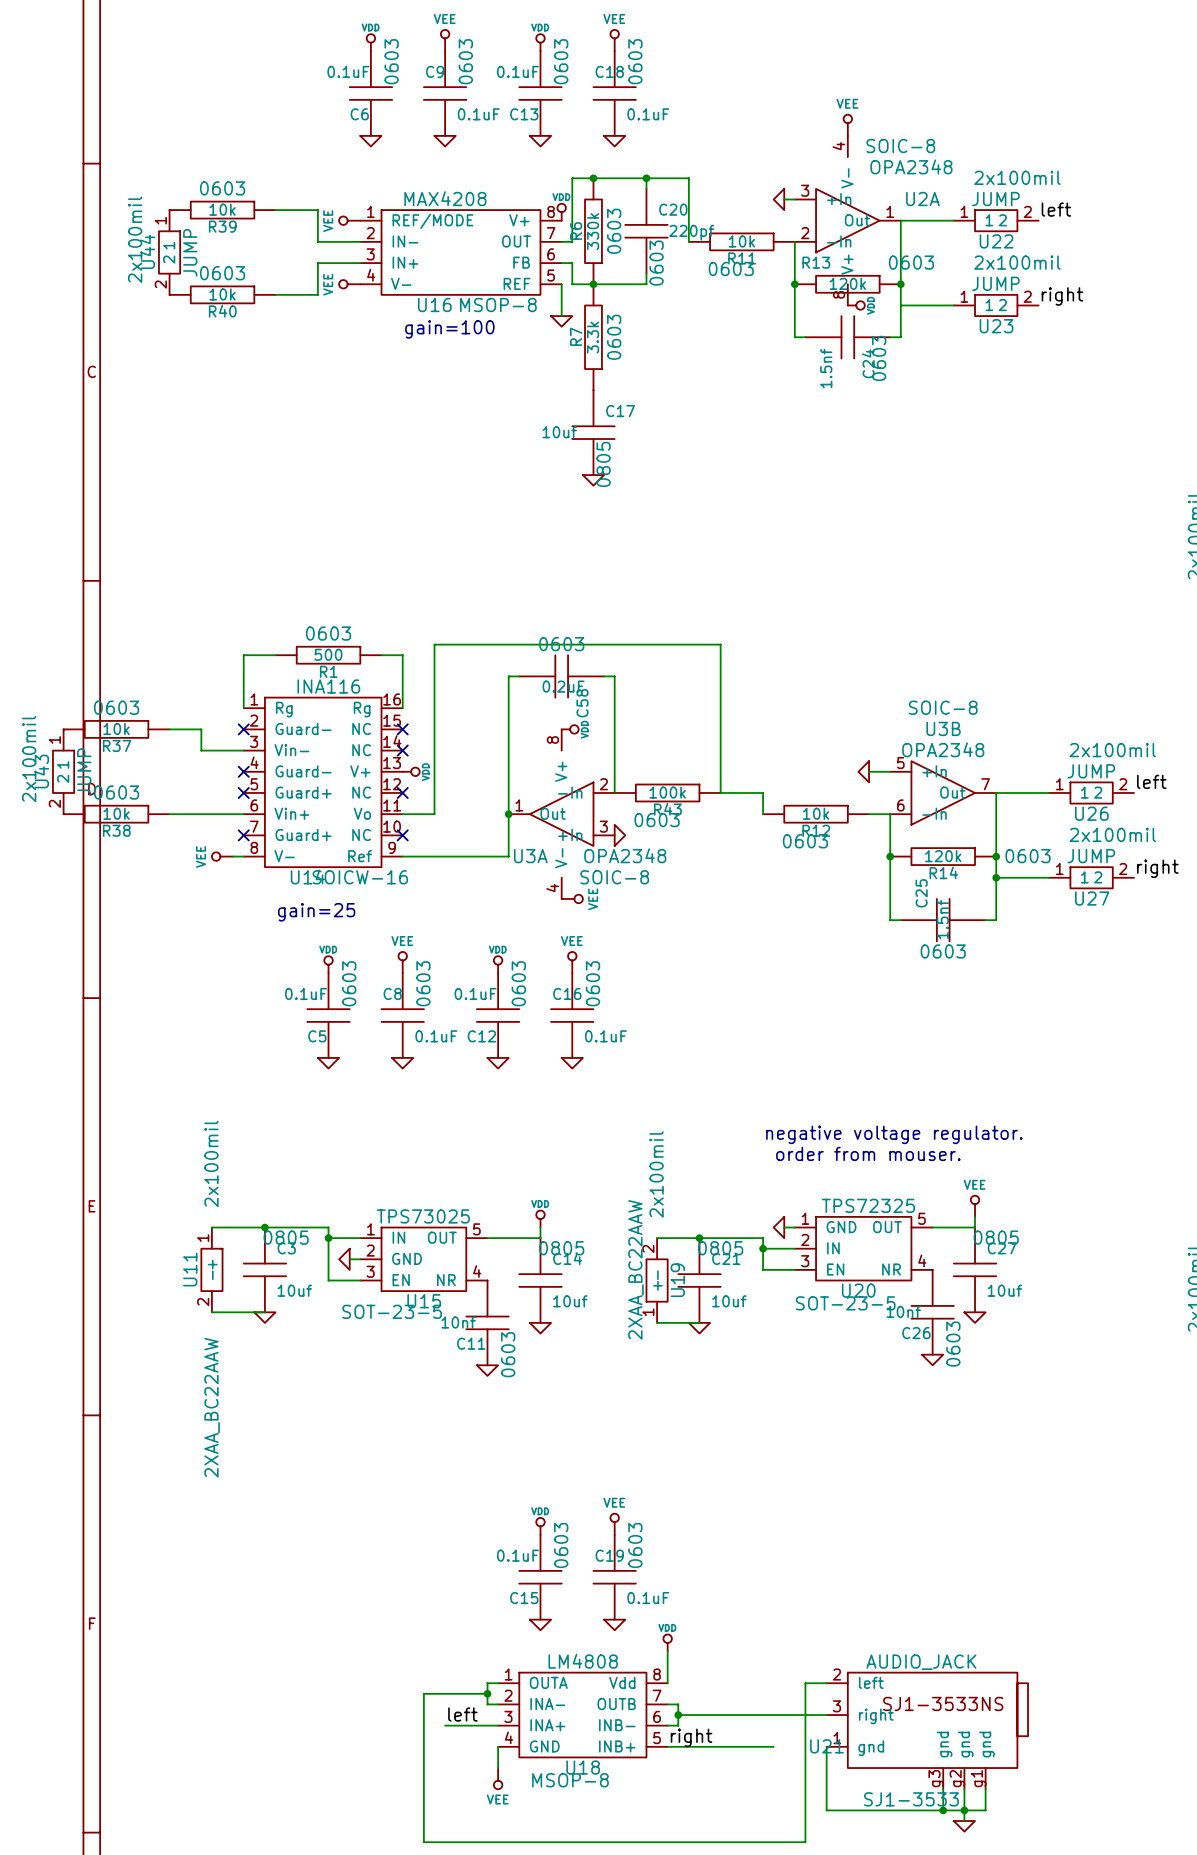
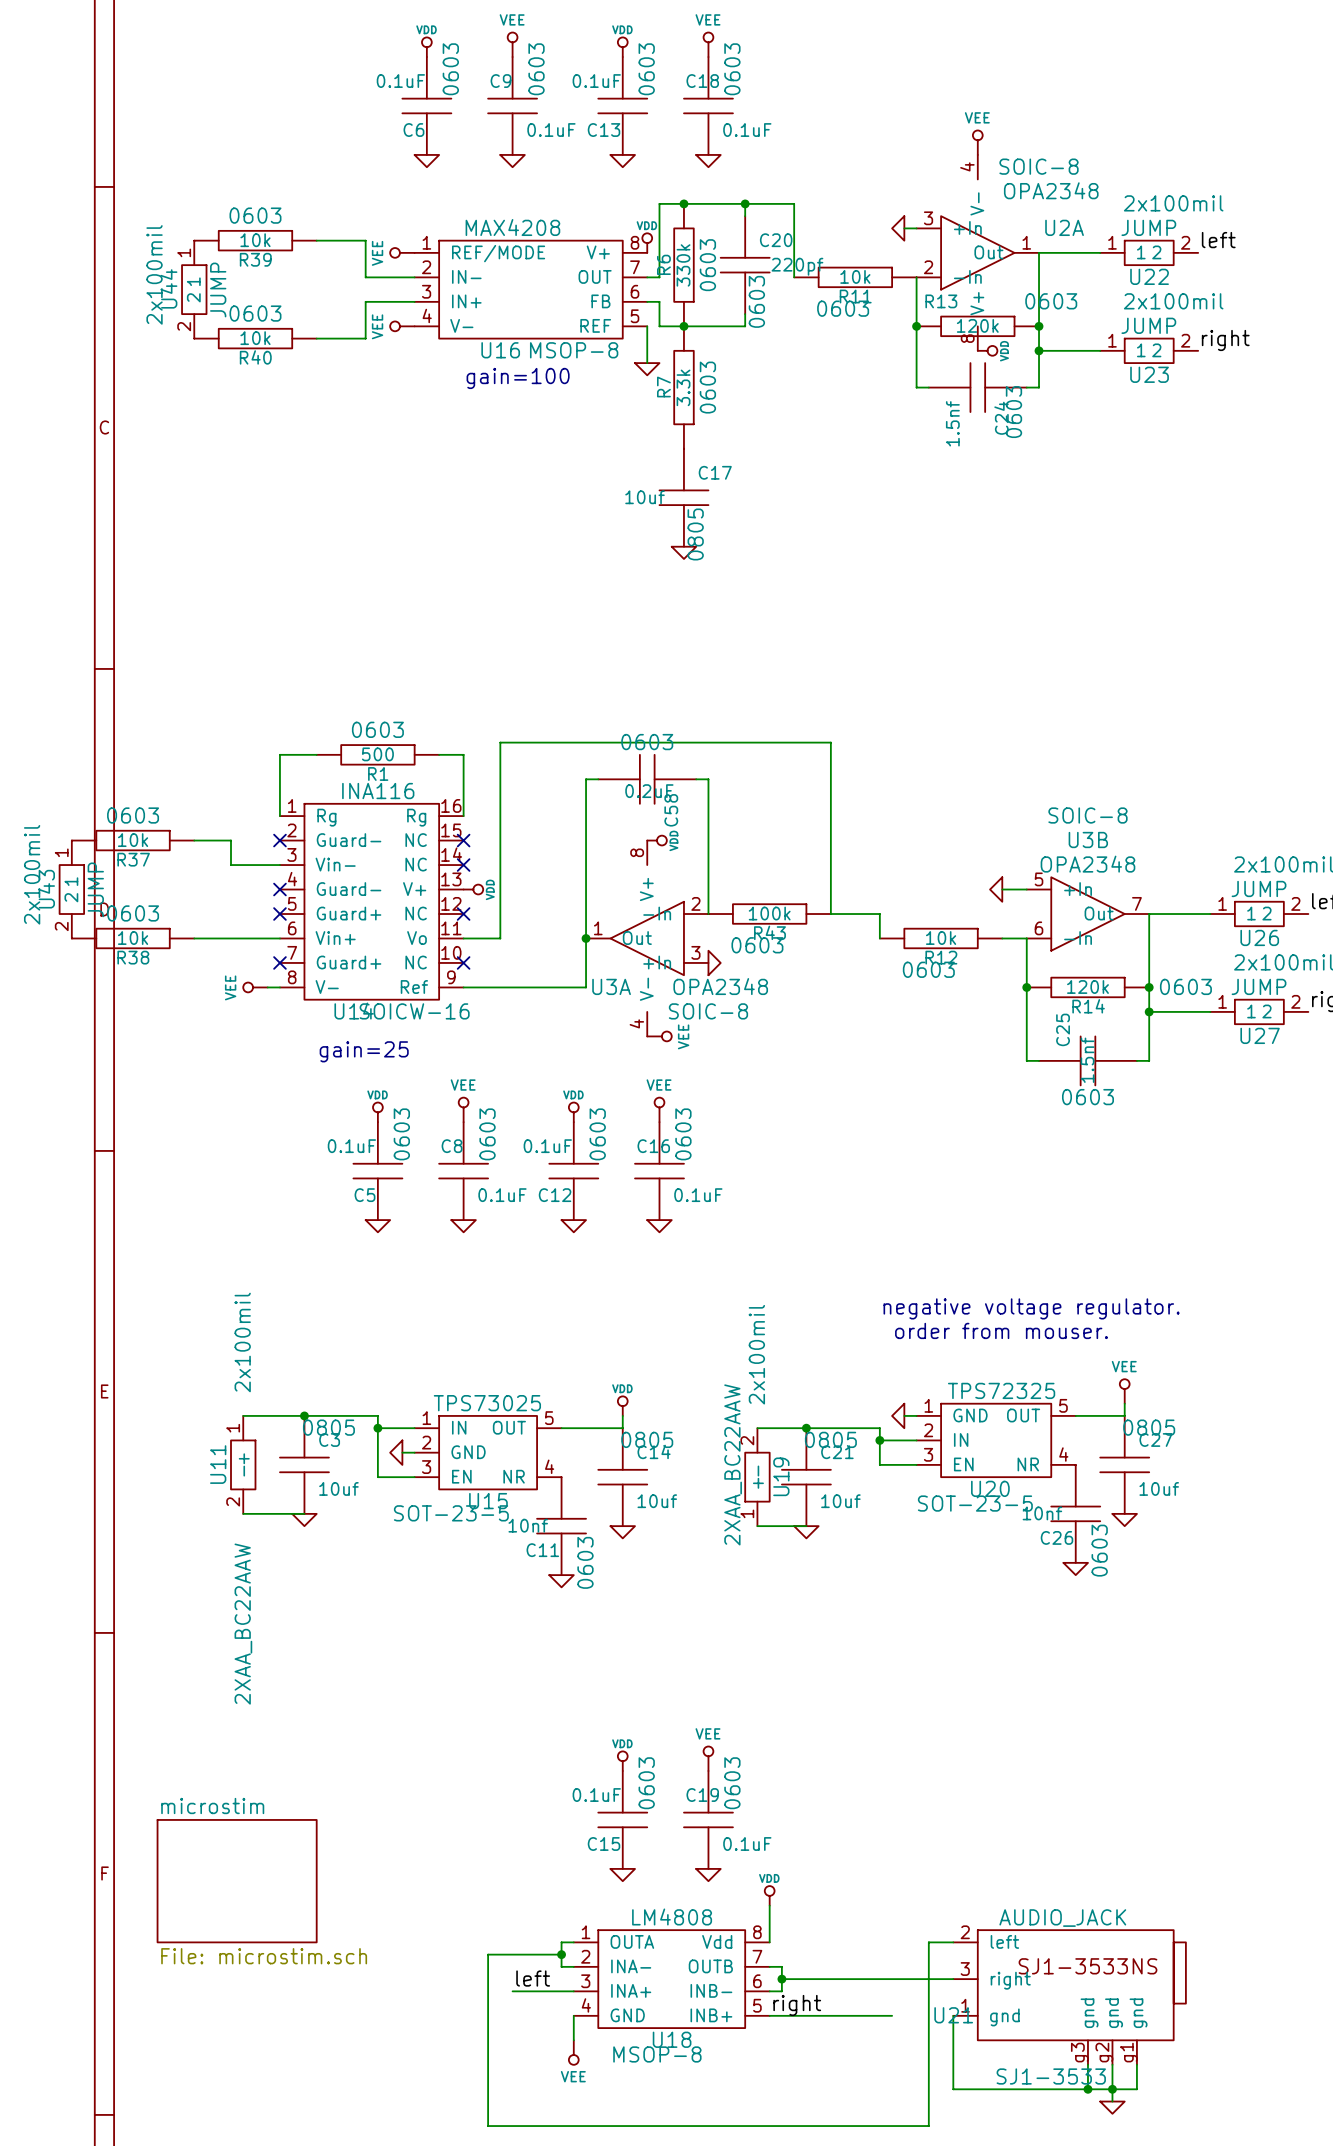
junction: none -> (1039, 350)
sheet microstim: none -> File: microstim.sch (237, 1881)

